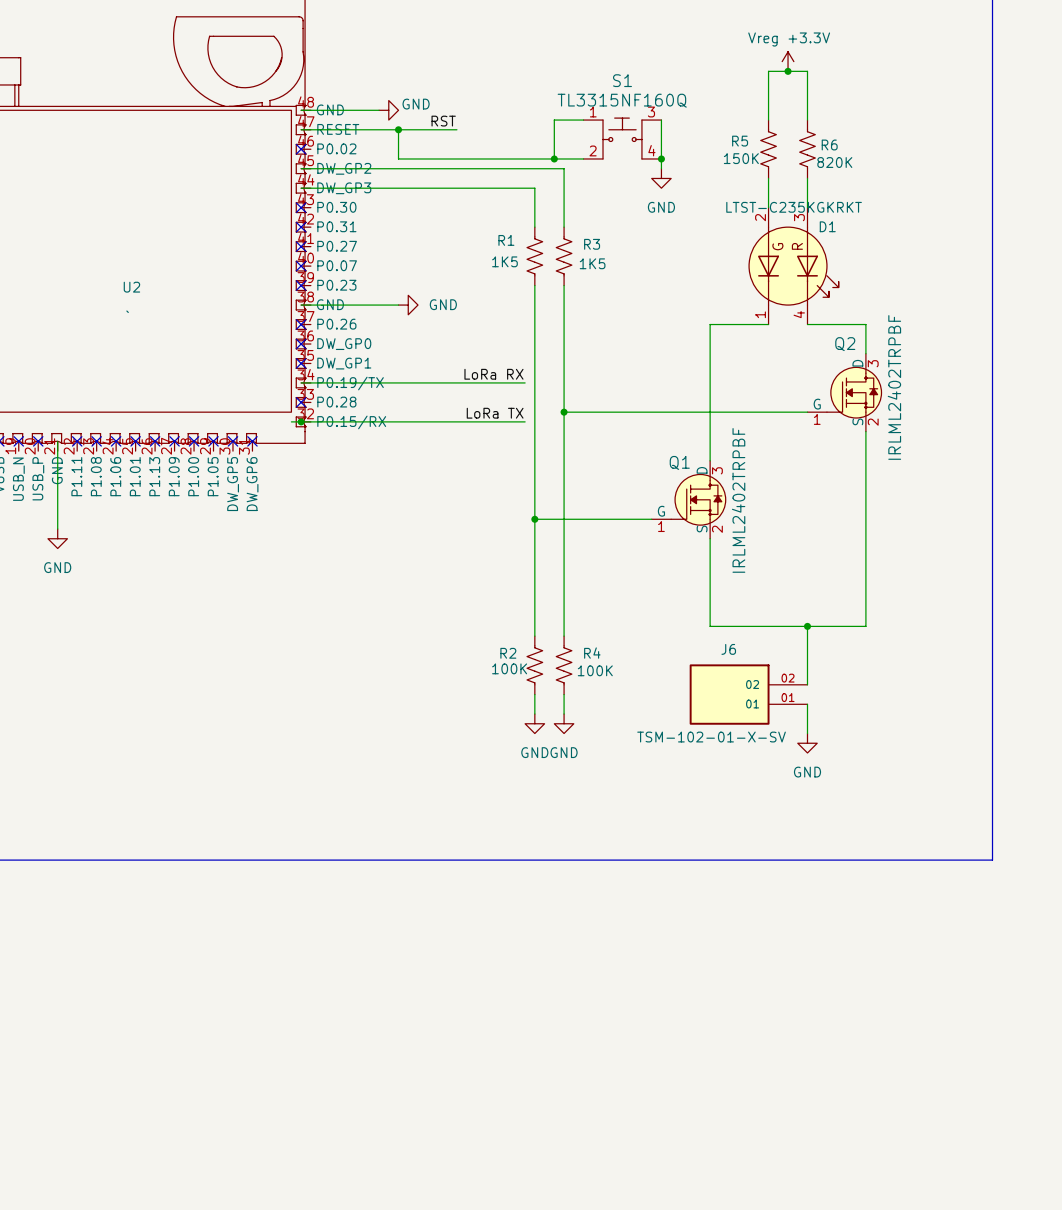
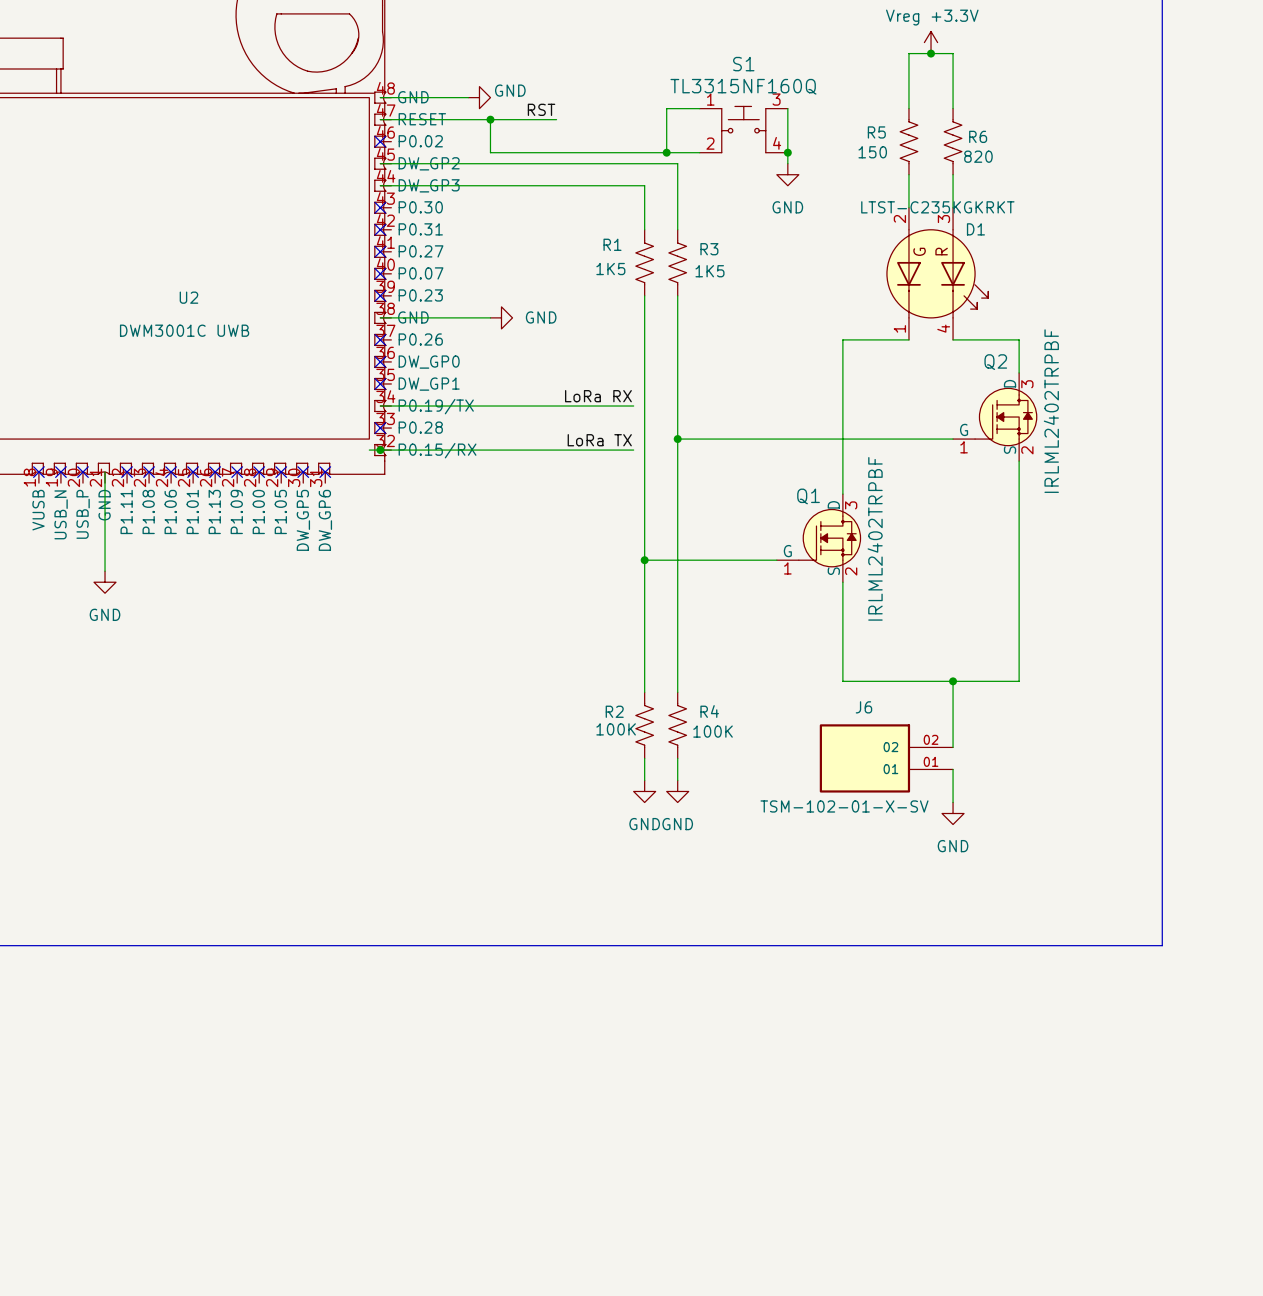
R5 value: 150K (741, 158) -> 150 (872, 152)
R6 value: 820K (834, 162) -> 820 (978, 156)
U2 value: ` (127, 311) -> DWM3001C UWB (184, 330)

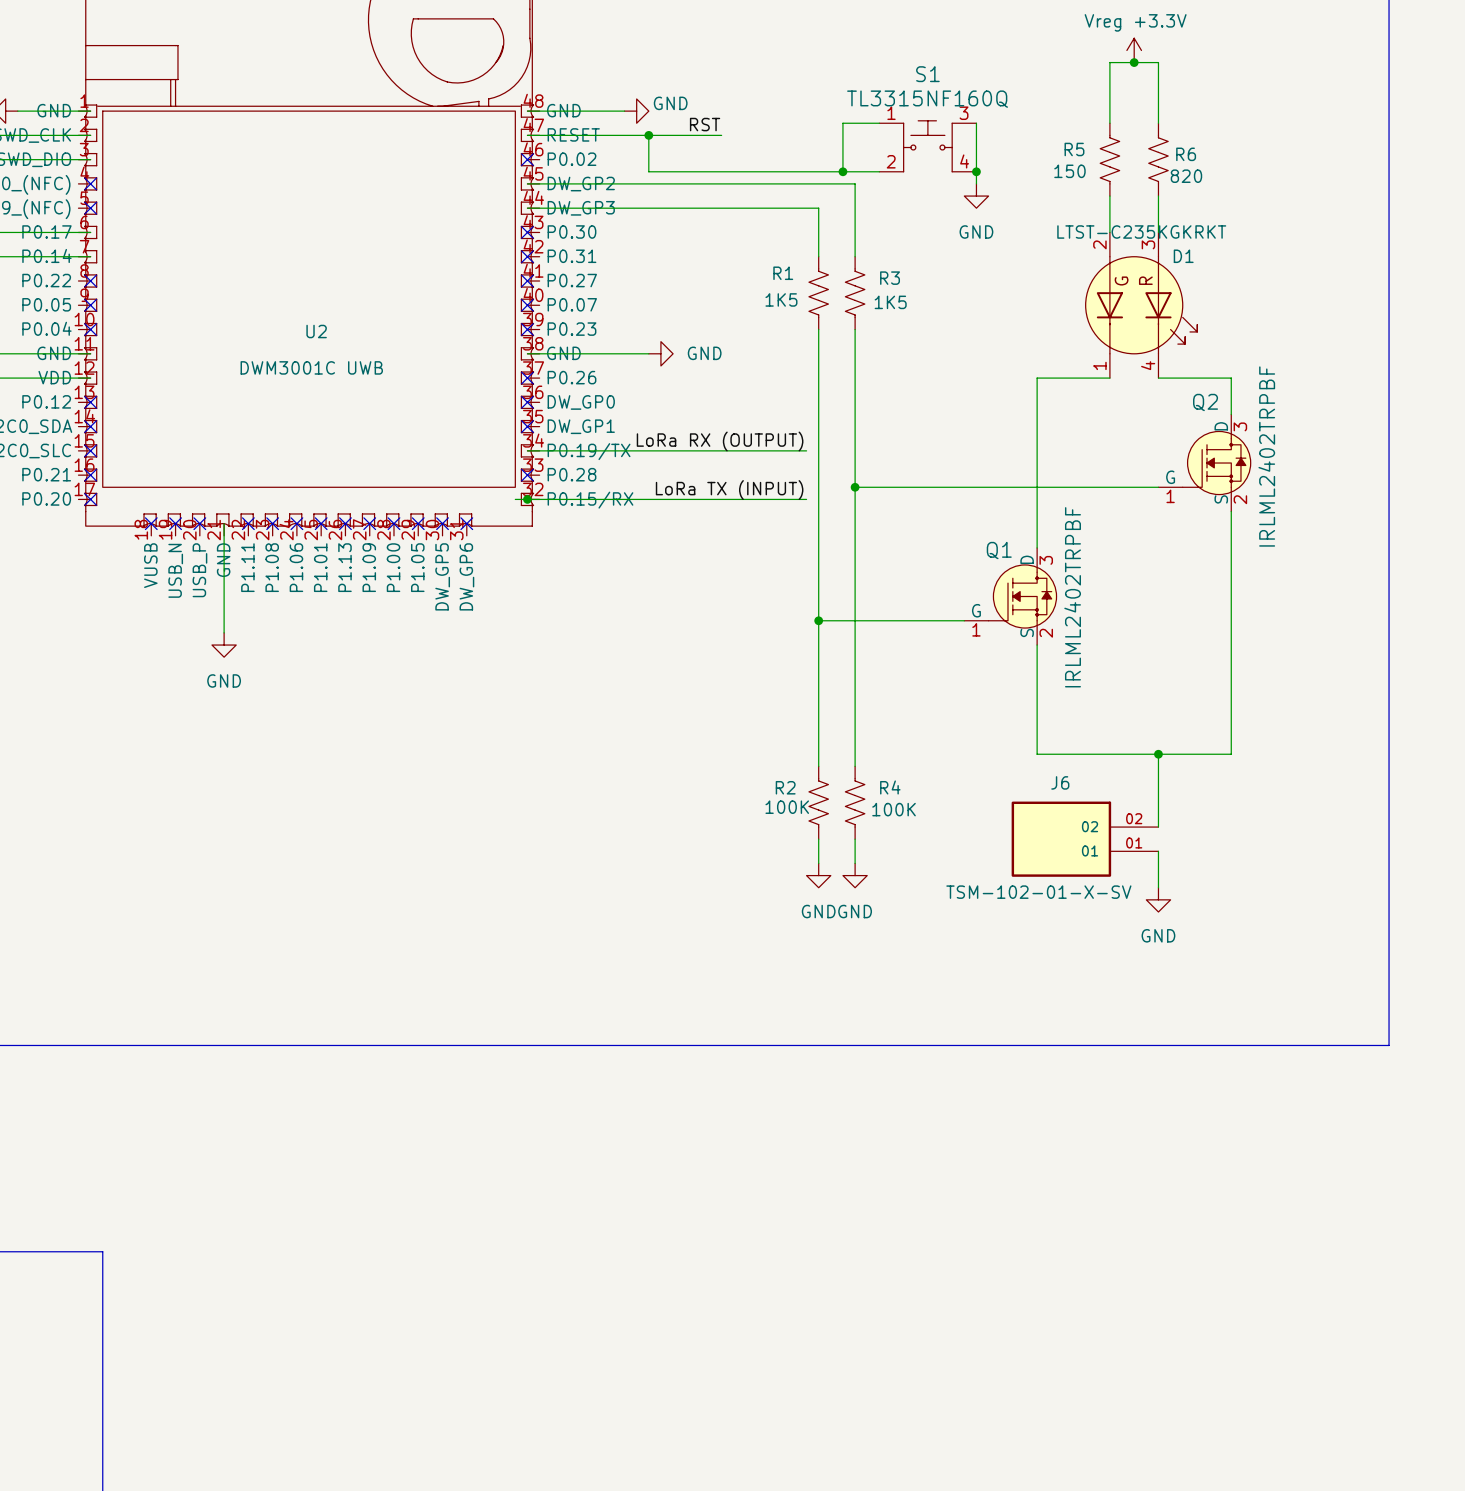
label: LoRa RX (598, 396) -> LoRa RX (OUTPUT) (720, 441)
label: LoRa TX (599, 440) -> LoRa TX (INPUT) (729, 490)

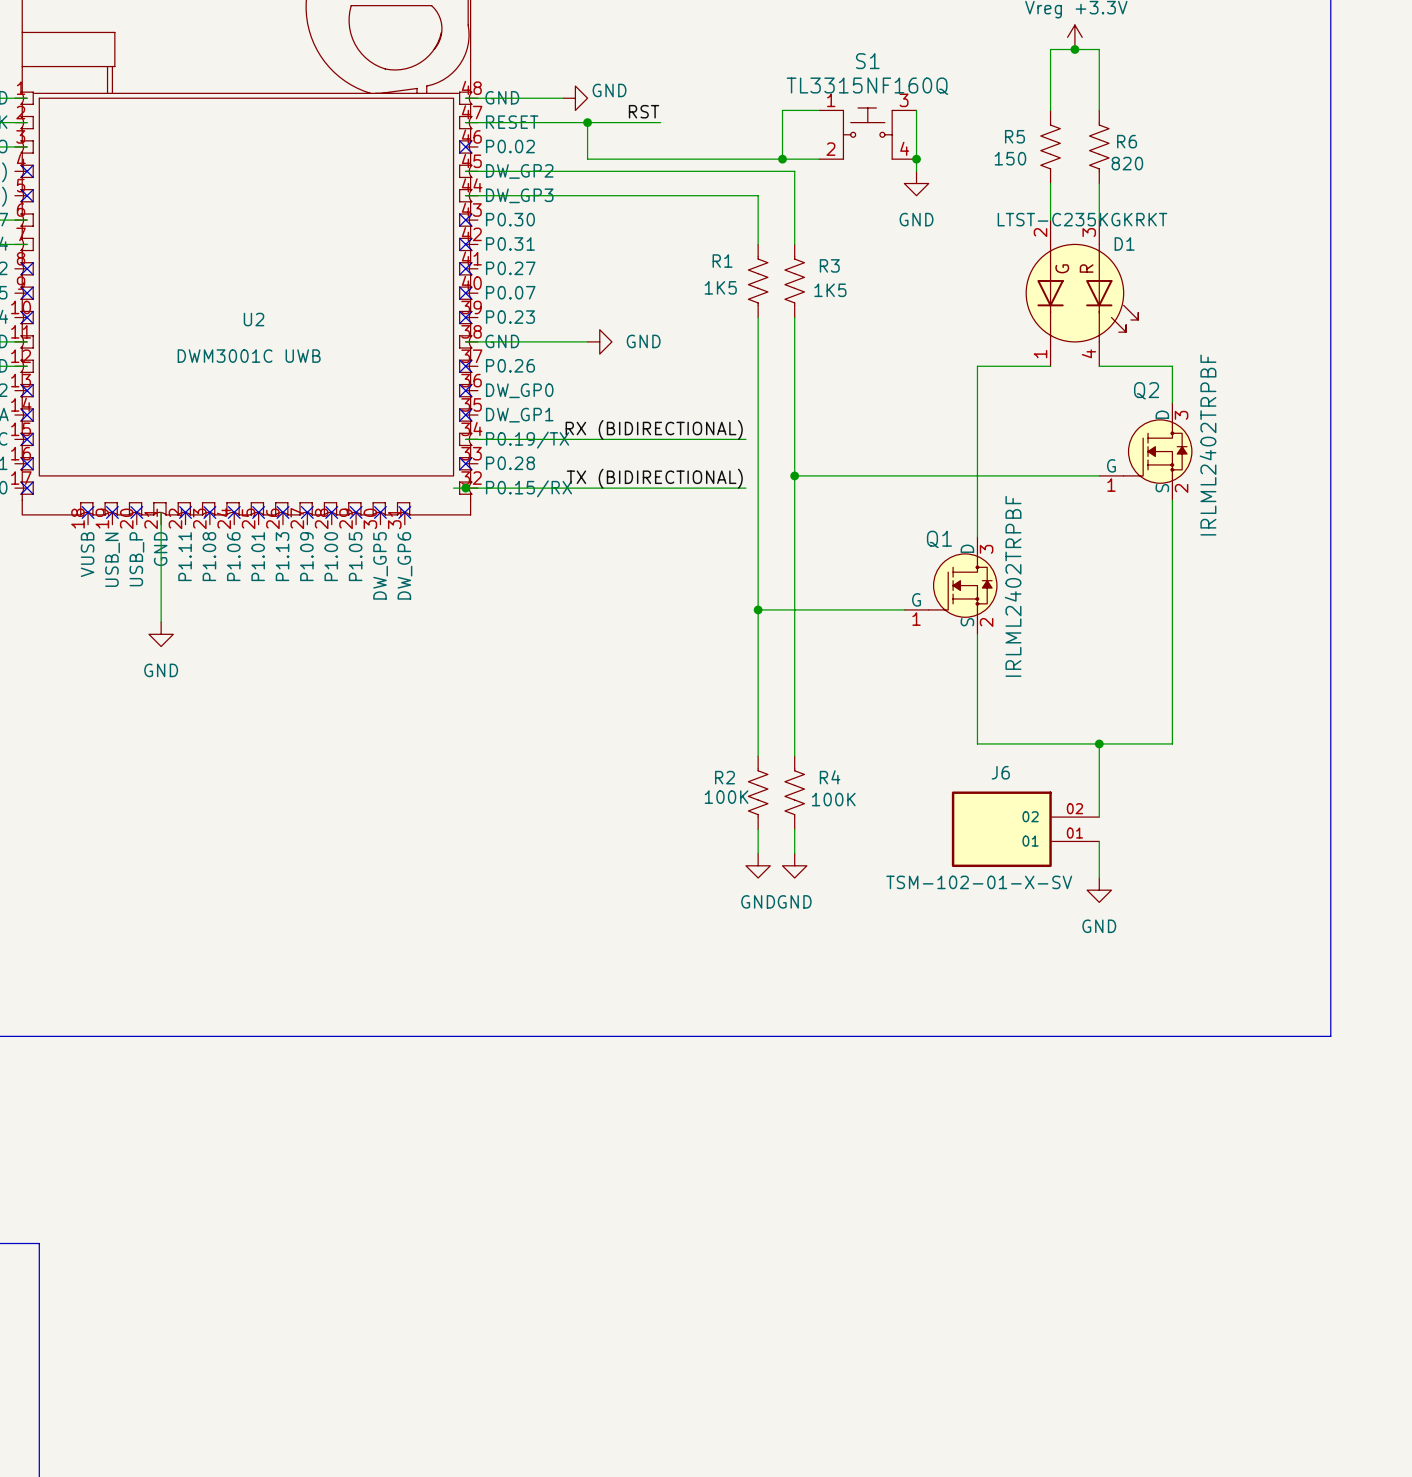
label: LoRa RX (OUTPUT) (720, 441) -> RX (BIDIRECTIONAL) (654, 429)
label: LoRa TX (INPUT) (729, 490) -> TX (BIDIRECTIONAL) (654, 478)

